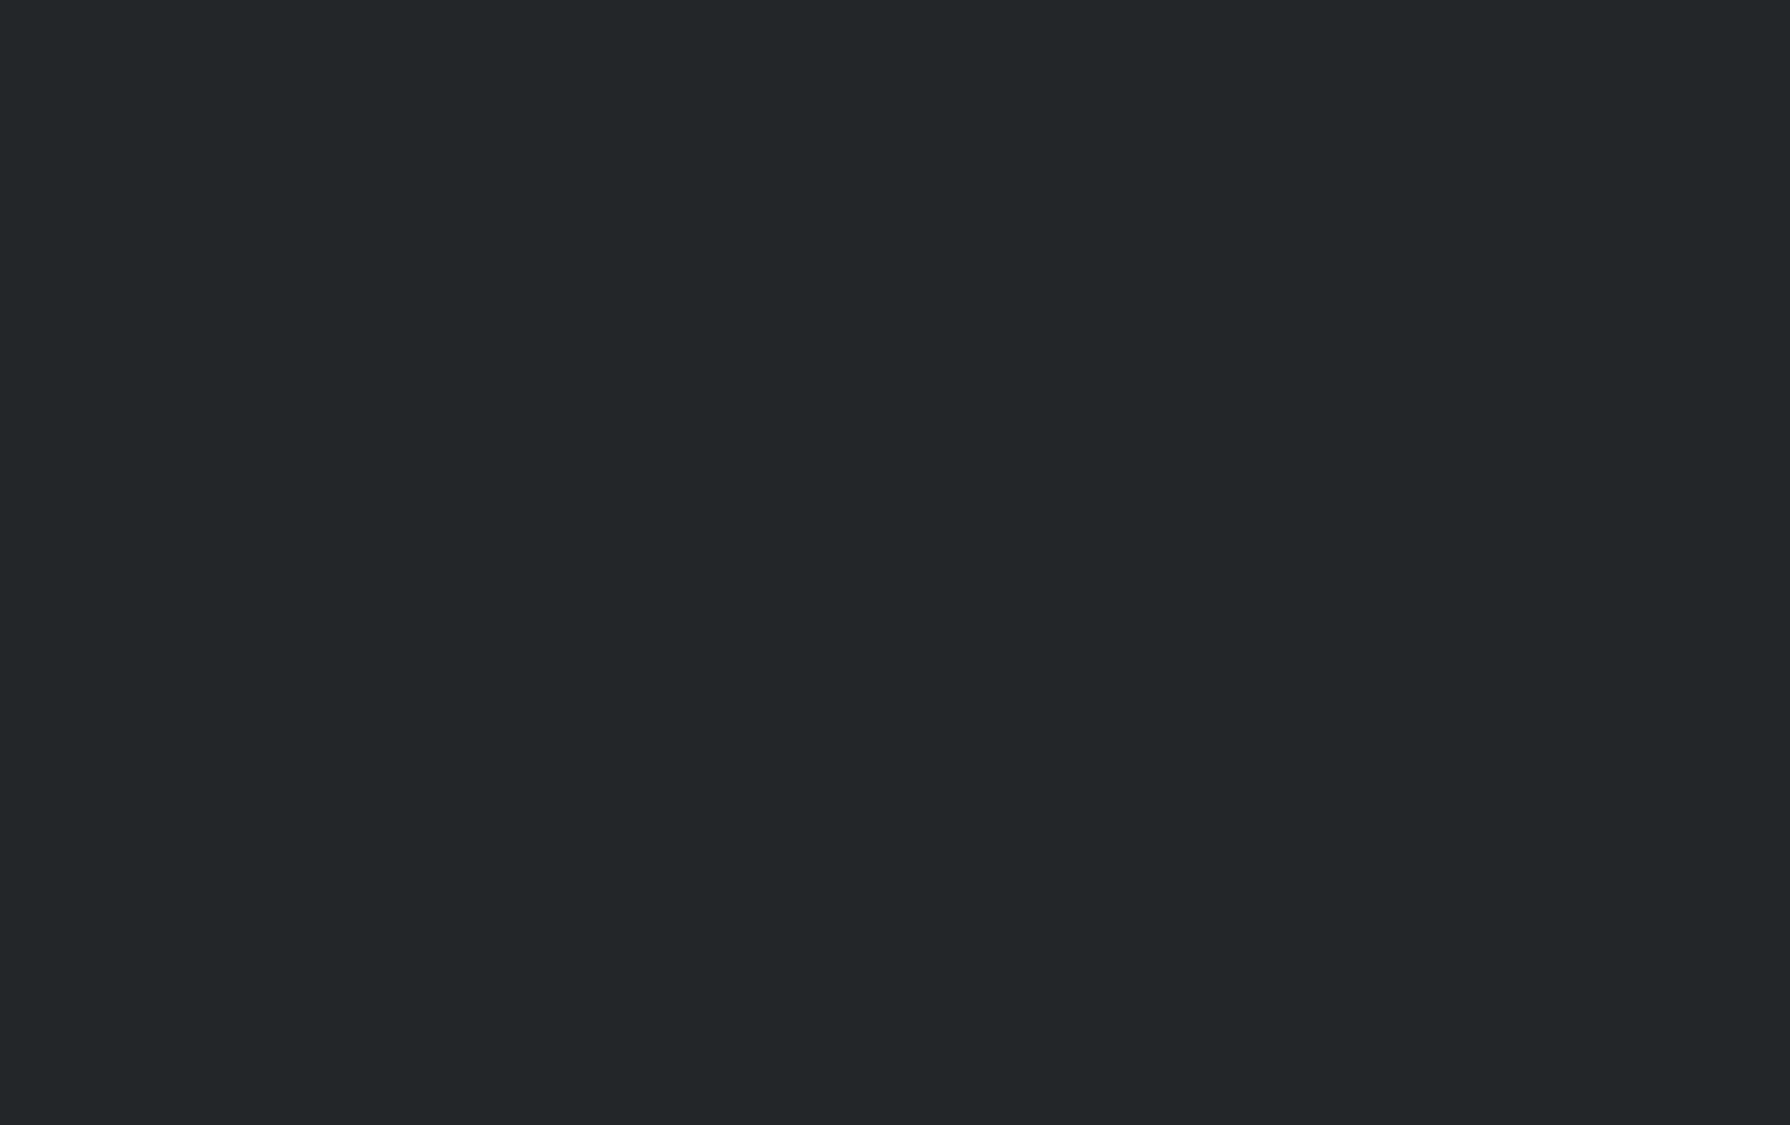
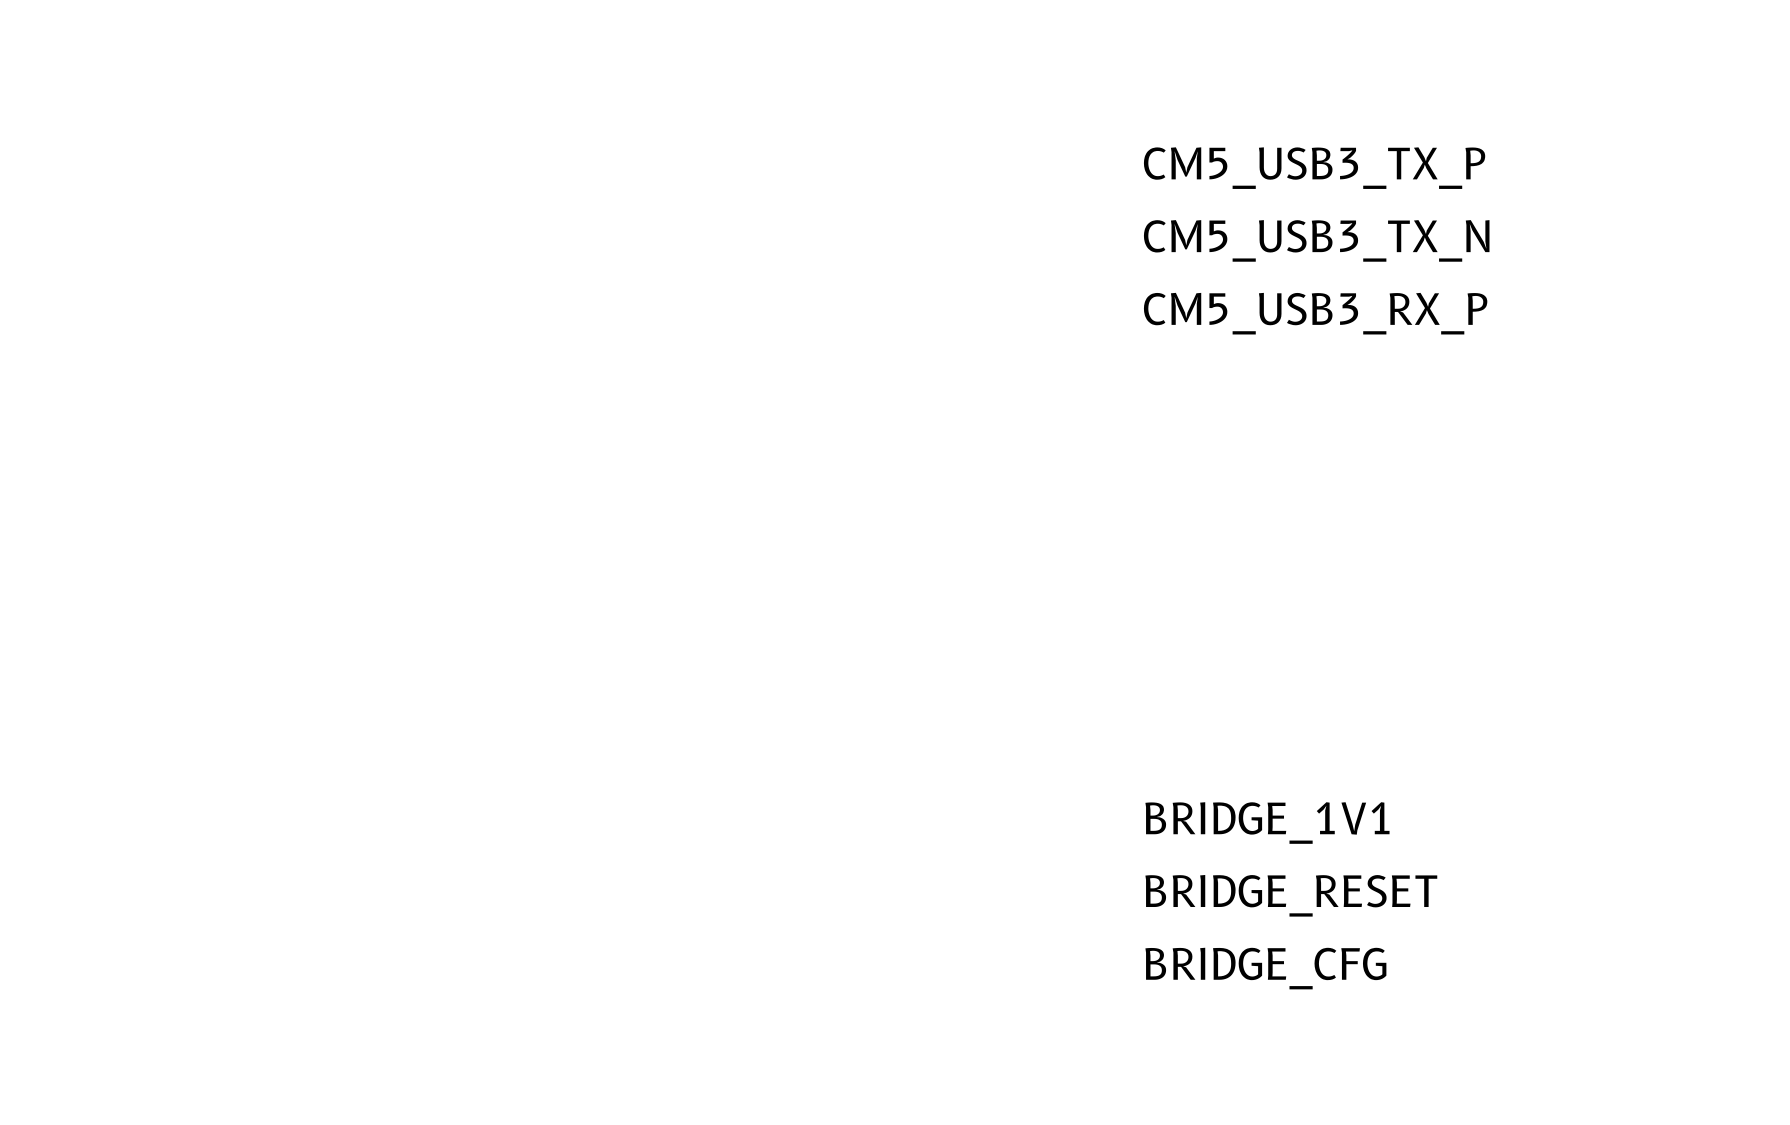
label: none -> CM5_USB3_TX_P (1314, 168)
label: none -> CM5_USB3_TX_N (1316, 240)
label: none -> CM5_USB3_RX_P (1315, 313)
label: none -> BRIDGE_1V1 (1267, 823)
label: none -> BRIDGE_RESET (1291, 895)
label: none -> BRIDGE_CFG (1265, 968)

